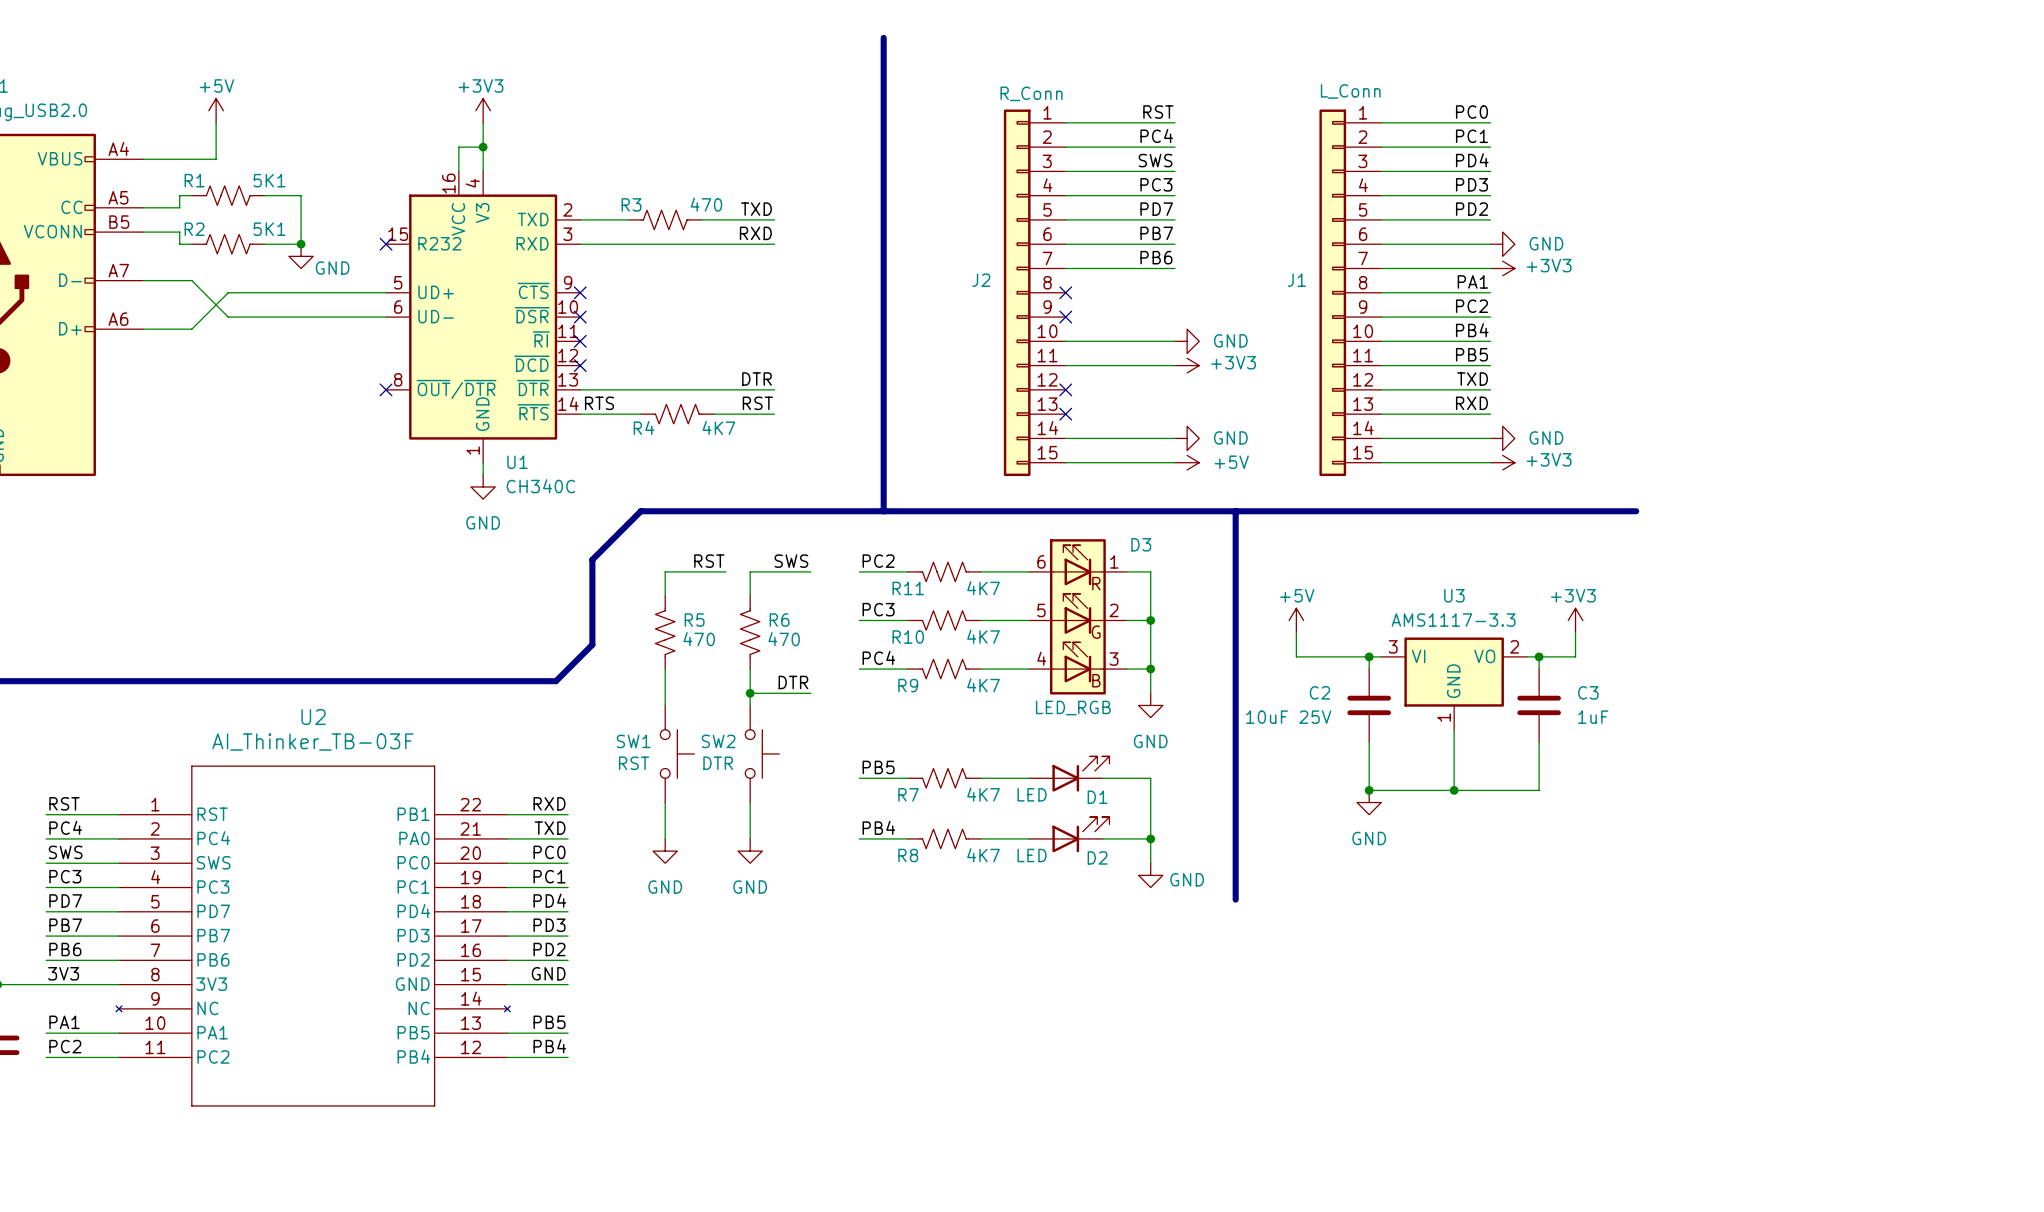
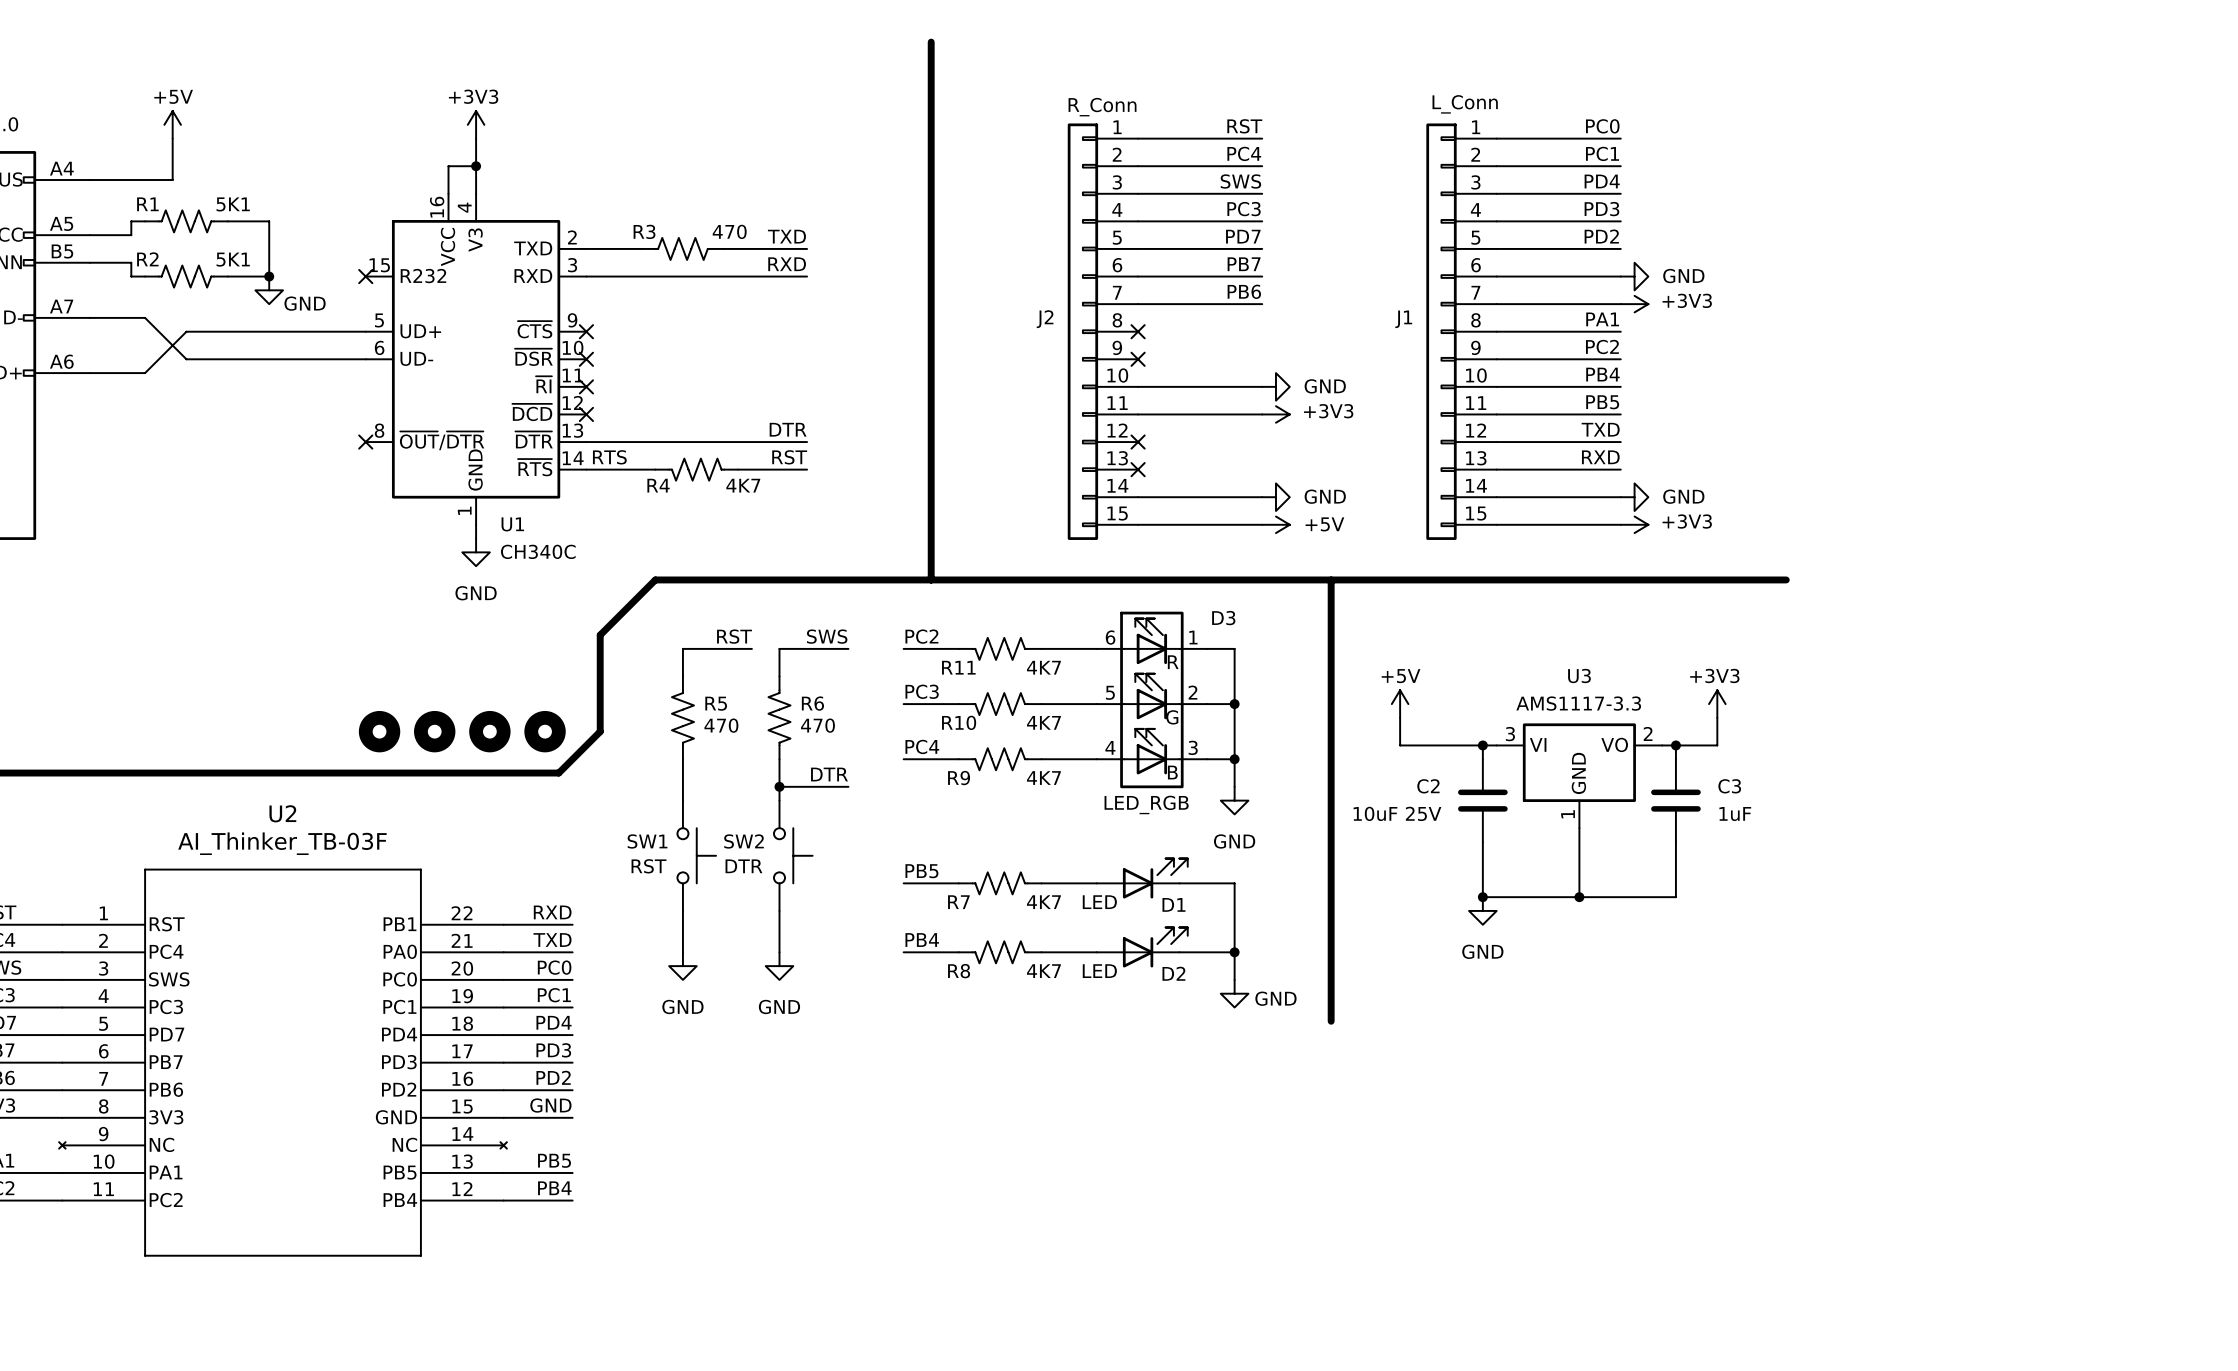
part: none -> (379, 731)
part: none -> (434, 731)
part: none -> (489, 731)
part: none -> (545, 731)

